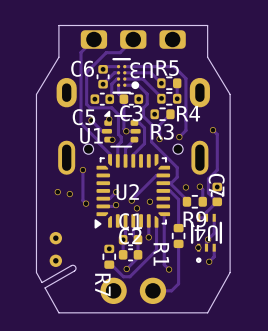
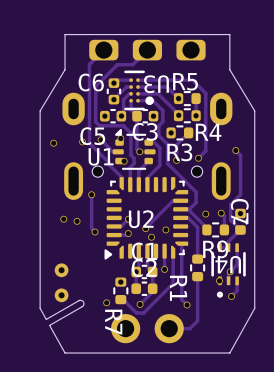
via: none -> (82, 141)
via: none -> (53, 143)
via: none -> (106, 302)

